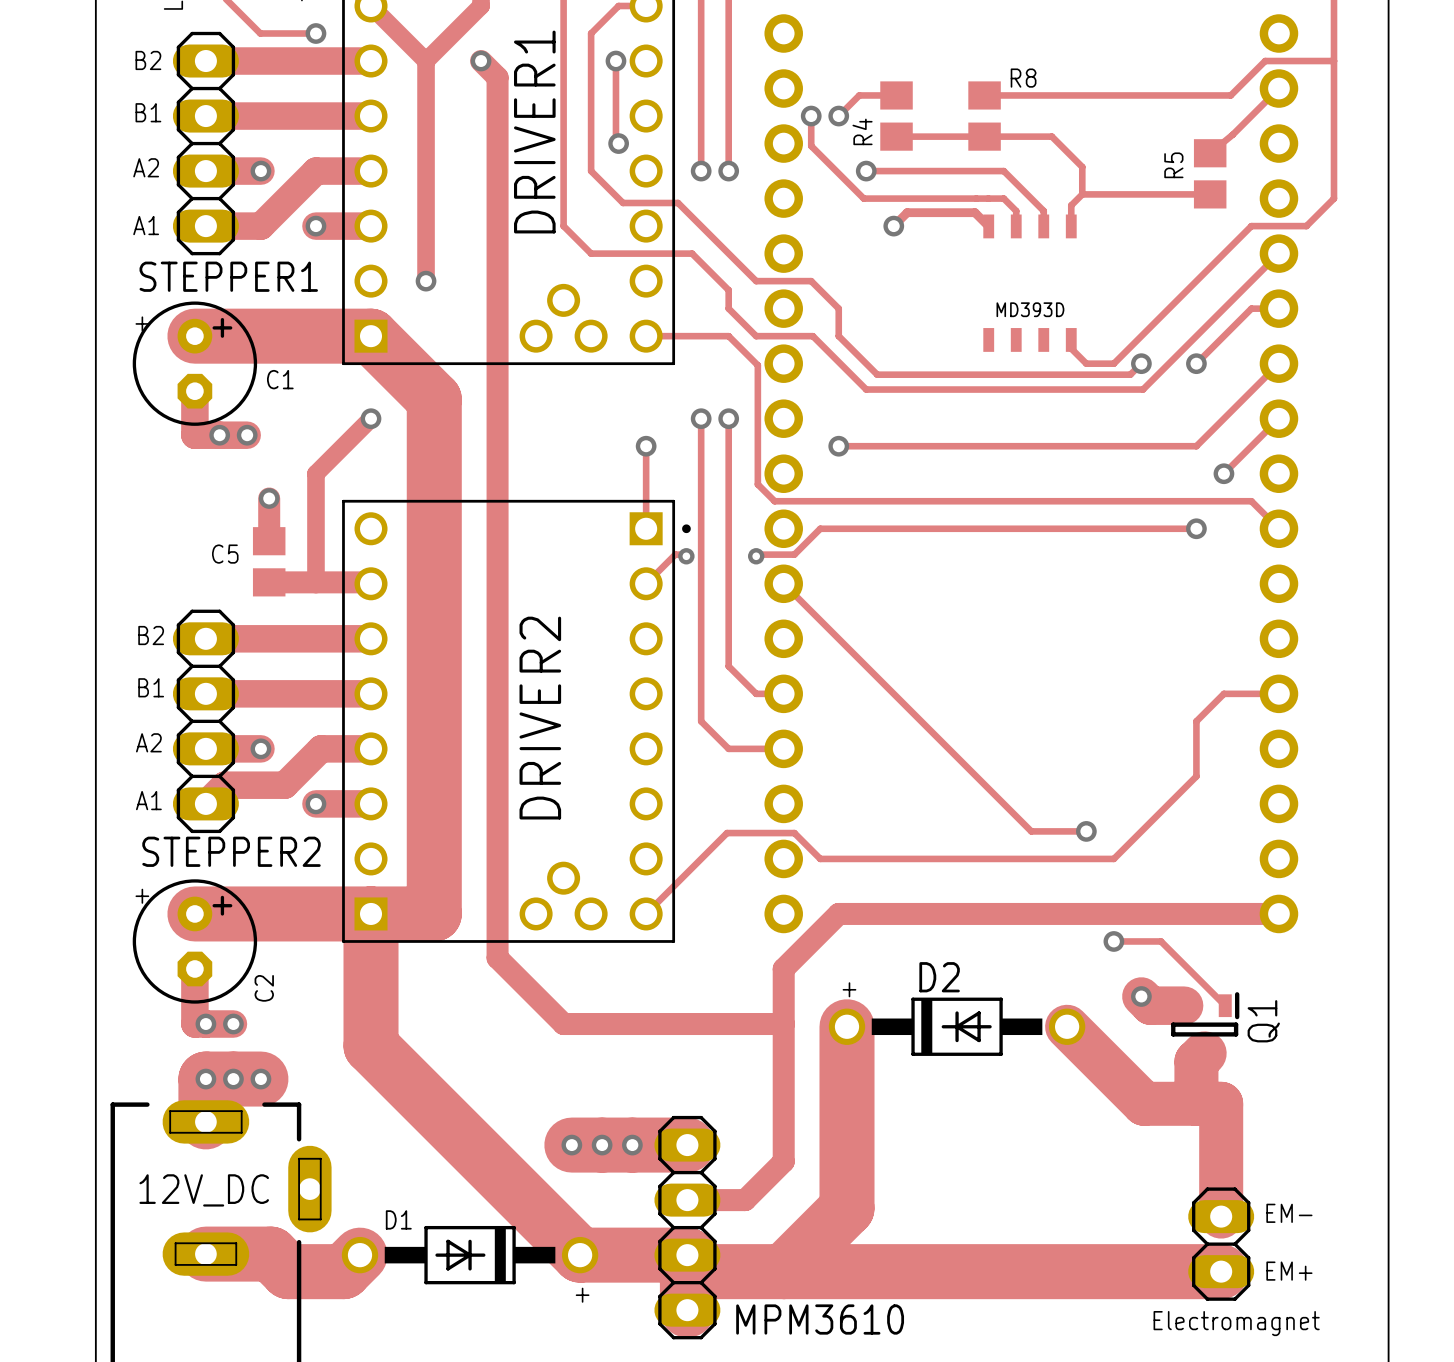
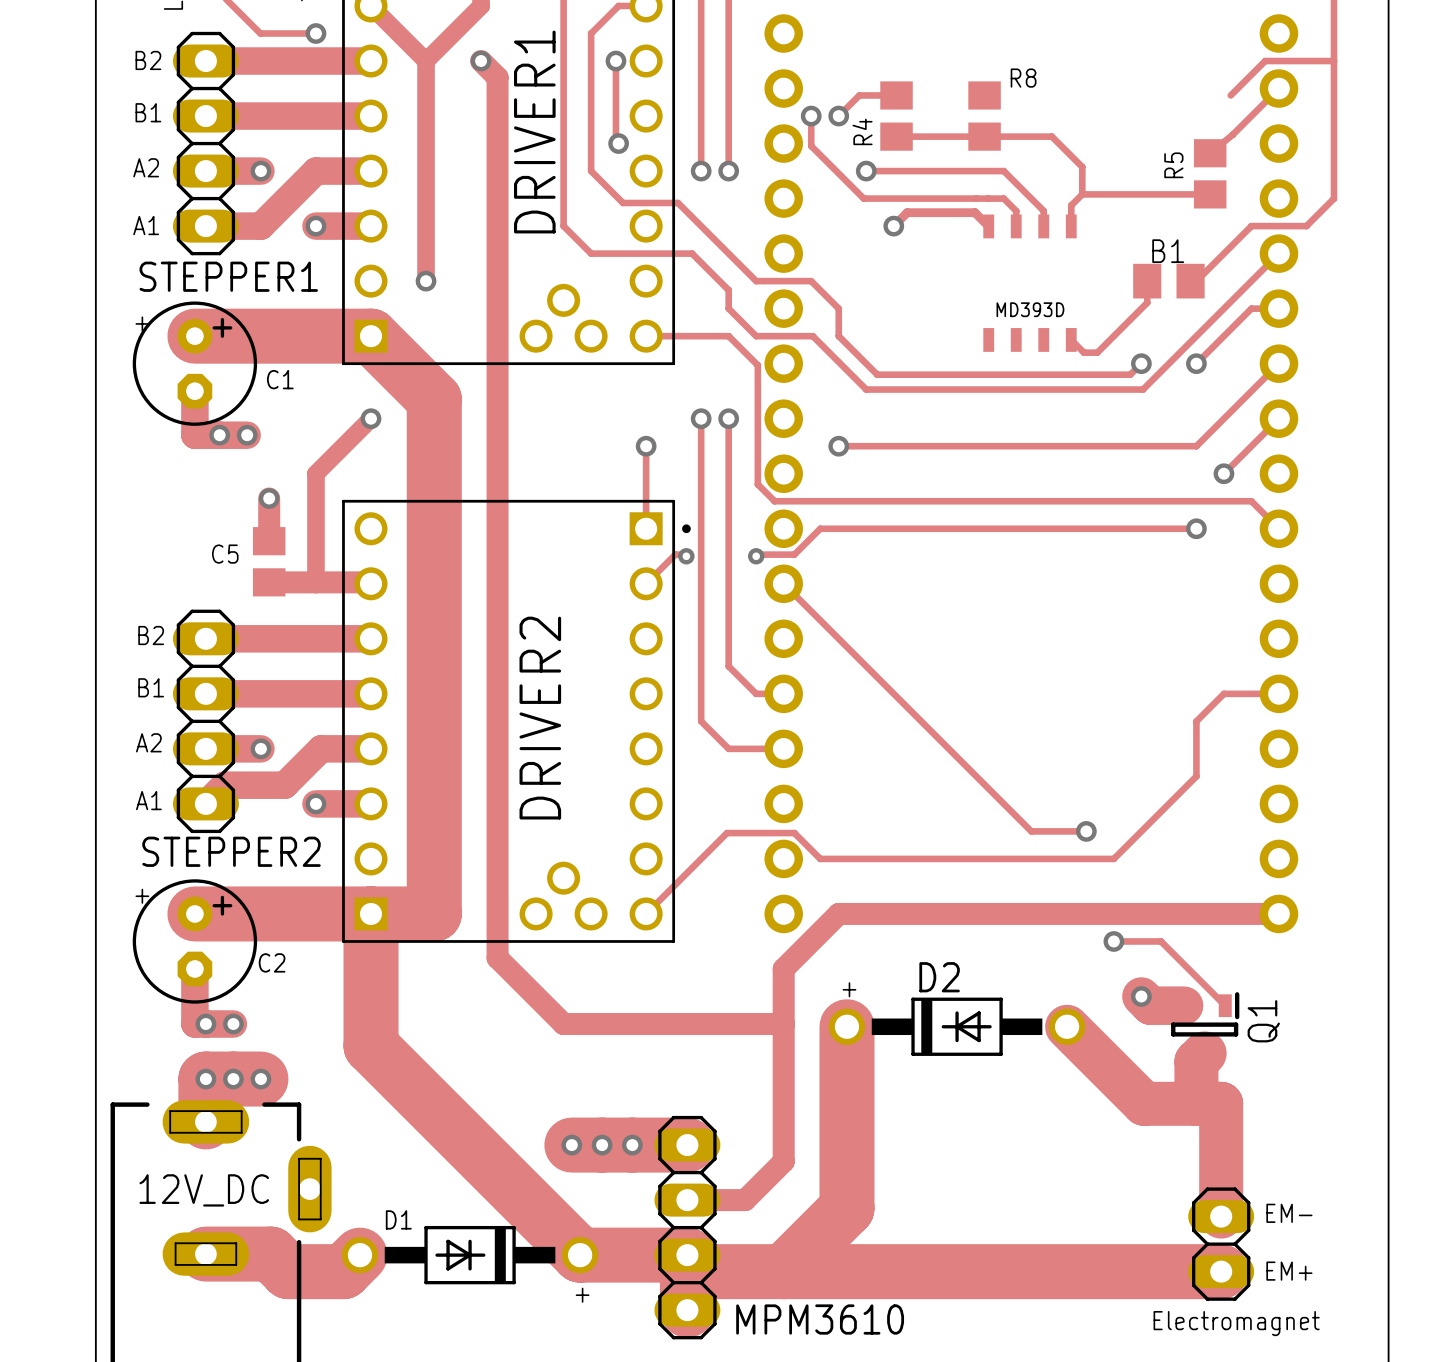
track: (984, 95) (1230, 95) -> none
B1: none -> (1168, 281)
track: (1196, 281) (1113, 363) (1086, 363) (1071, 348) (1071, 339) -> (1147, 281) (1147, 302) (1097, 352) (1083, 352) (1071, 339)
C2 name rotation: 0° (264, 988) -> 90° clockwise (272, 962)

